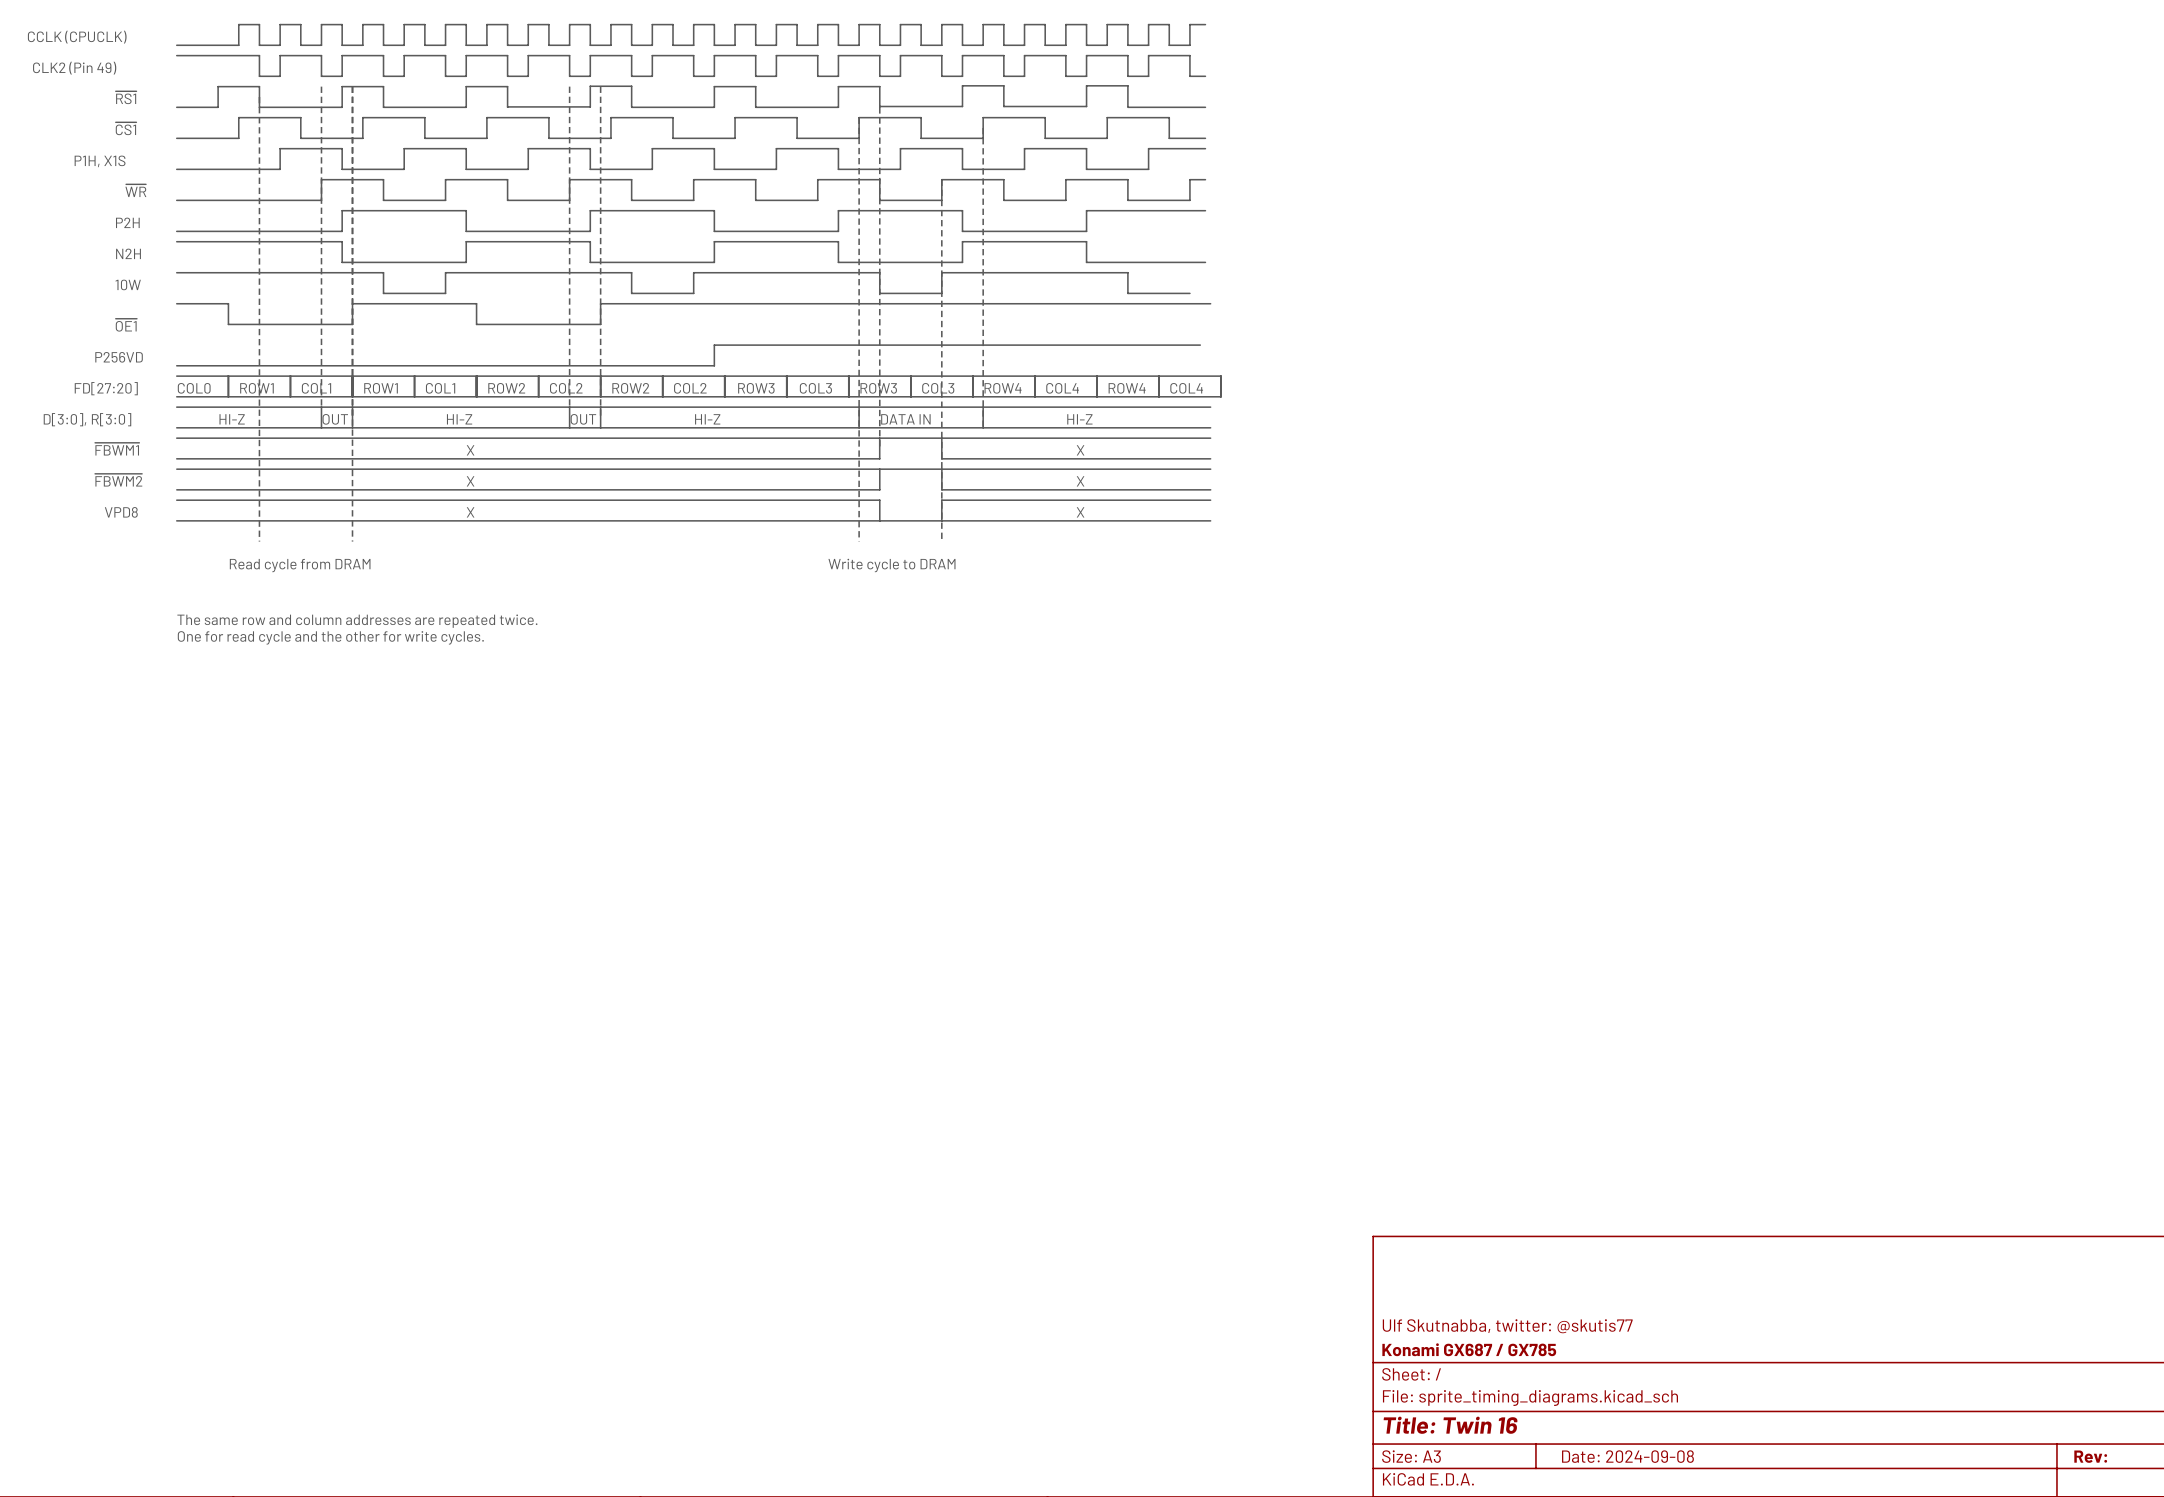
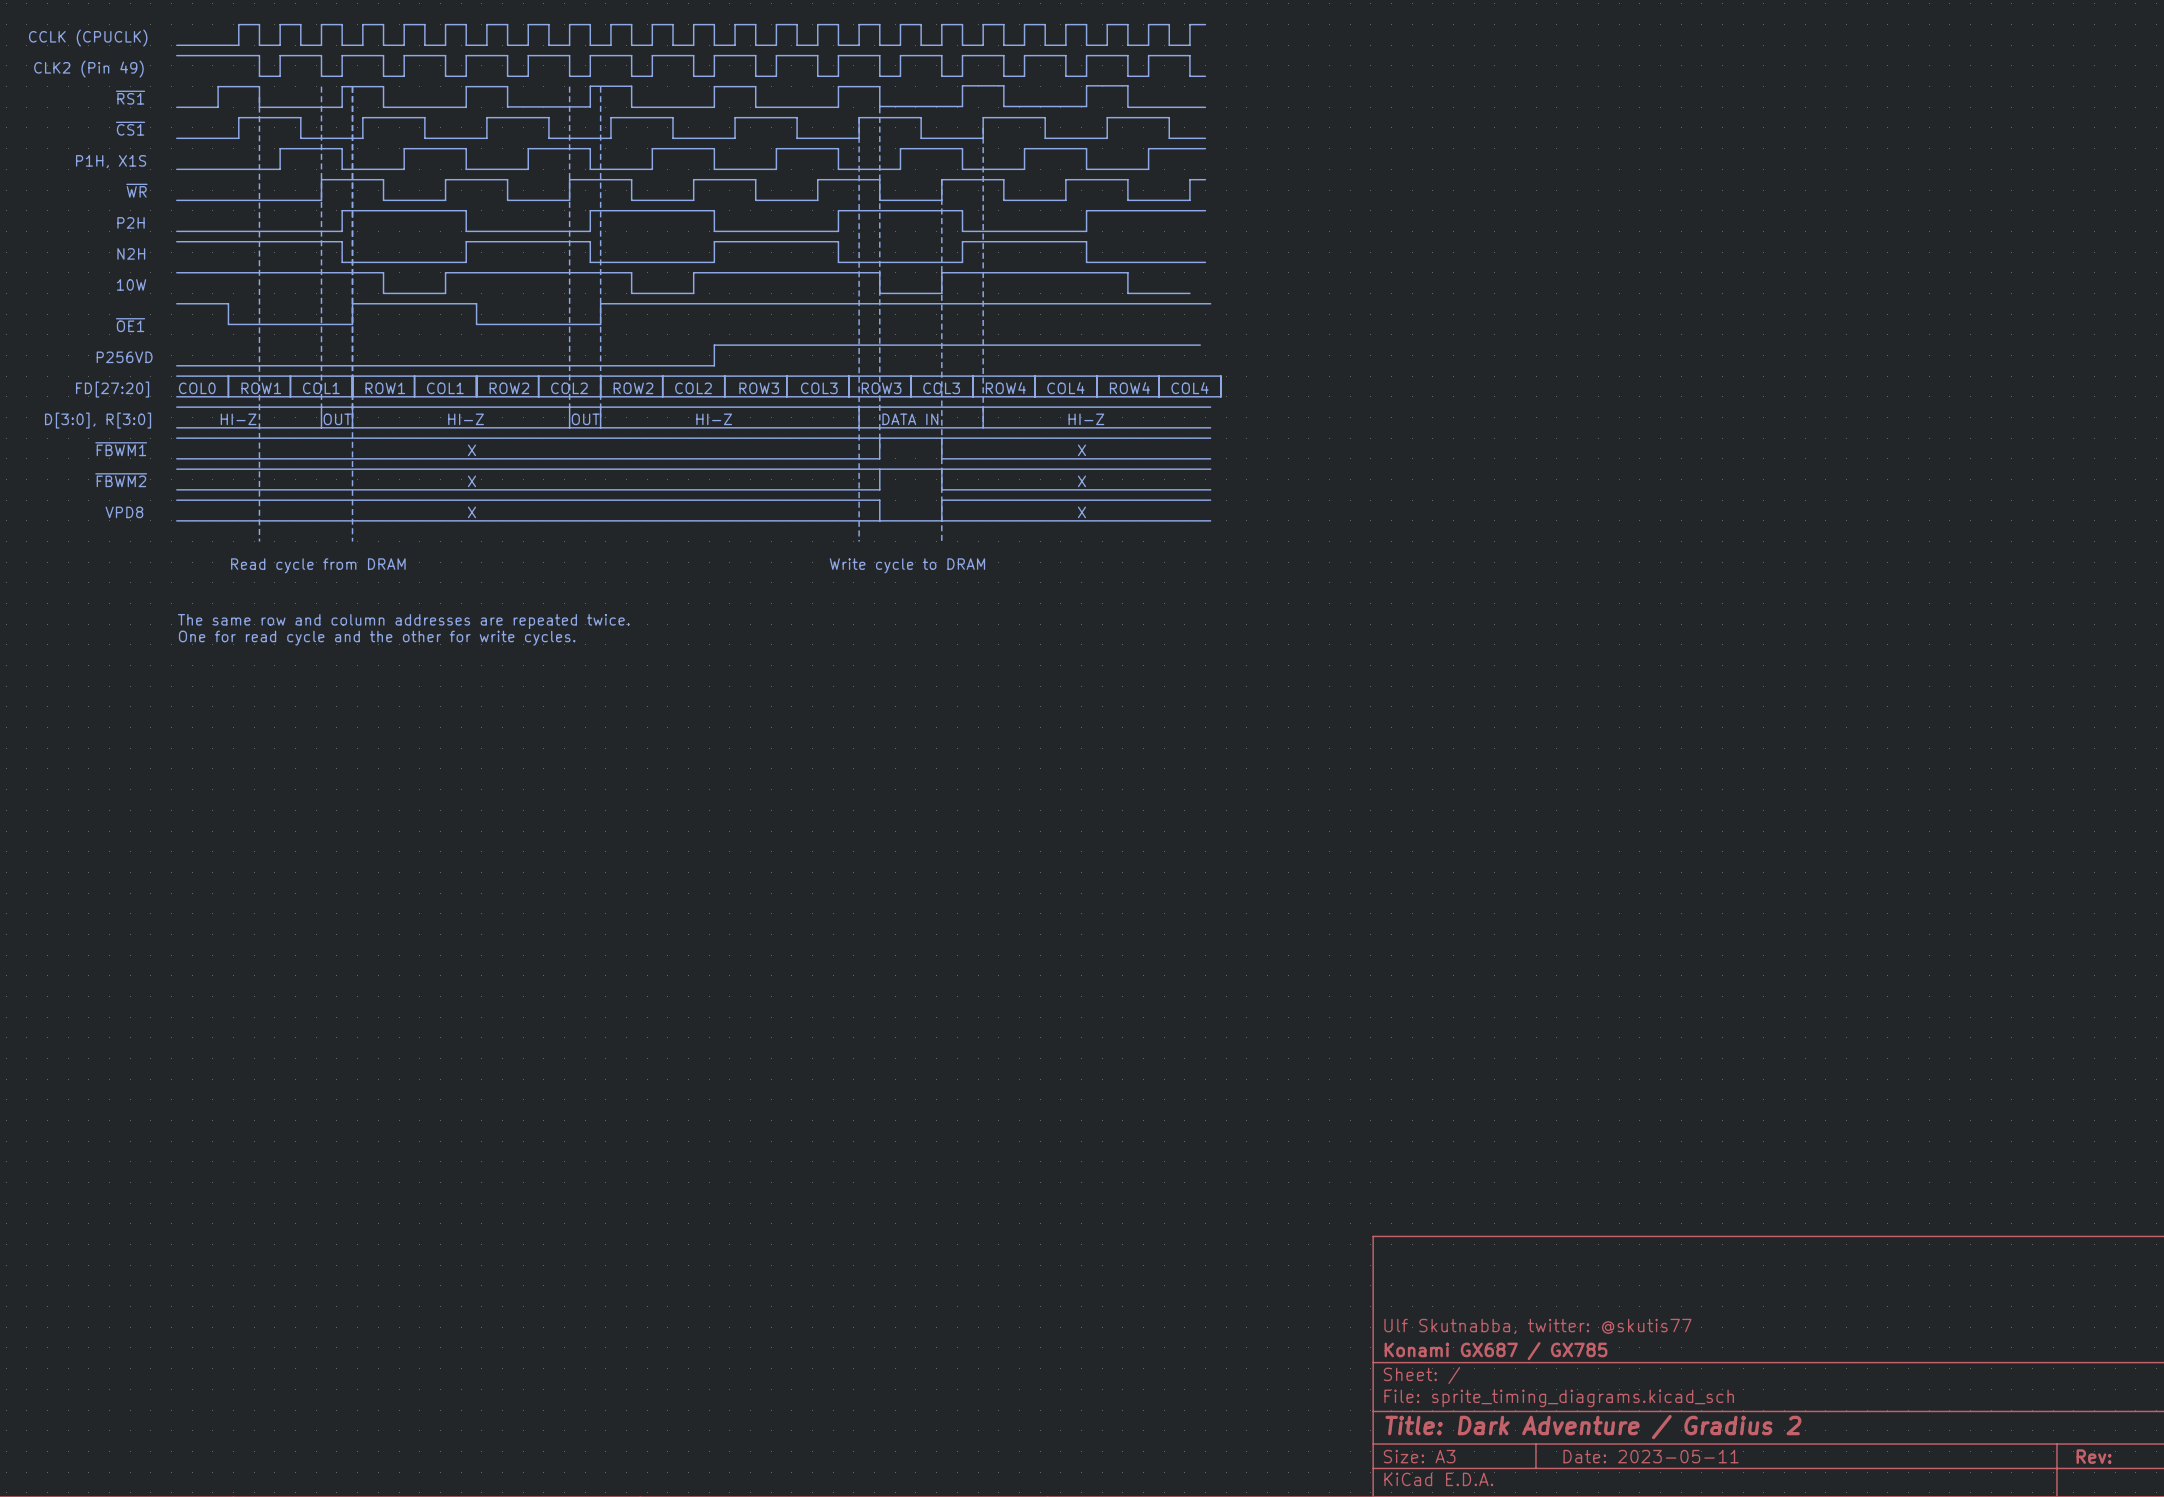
title block: Title: Twin 16 (1450, 1425) -> Title: Dark Adventure / Gradius 2 (1593, 1427)
title block: Date: 2024-09-08 (1627, 1456) -> Date: 2023-05-11 (1651, 1456)

